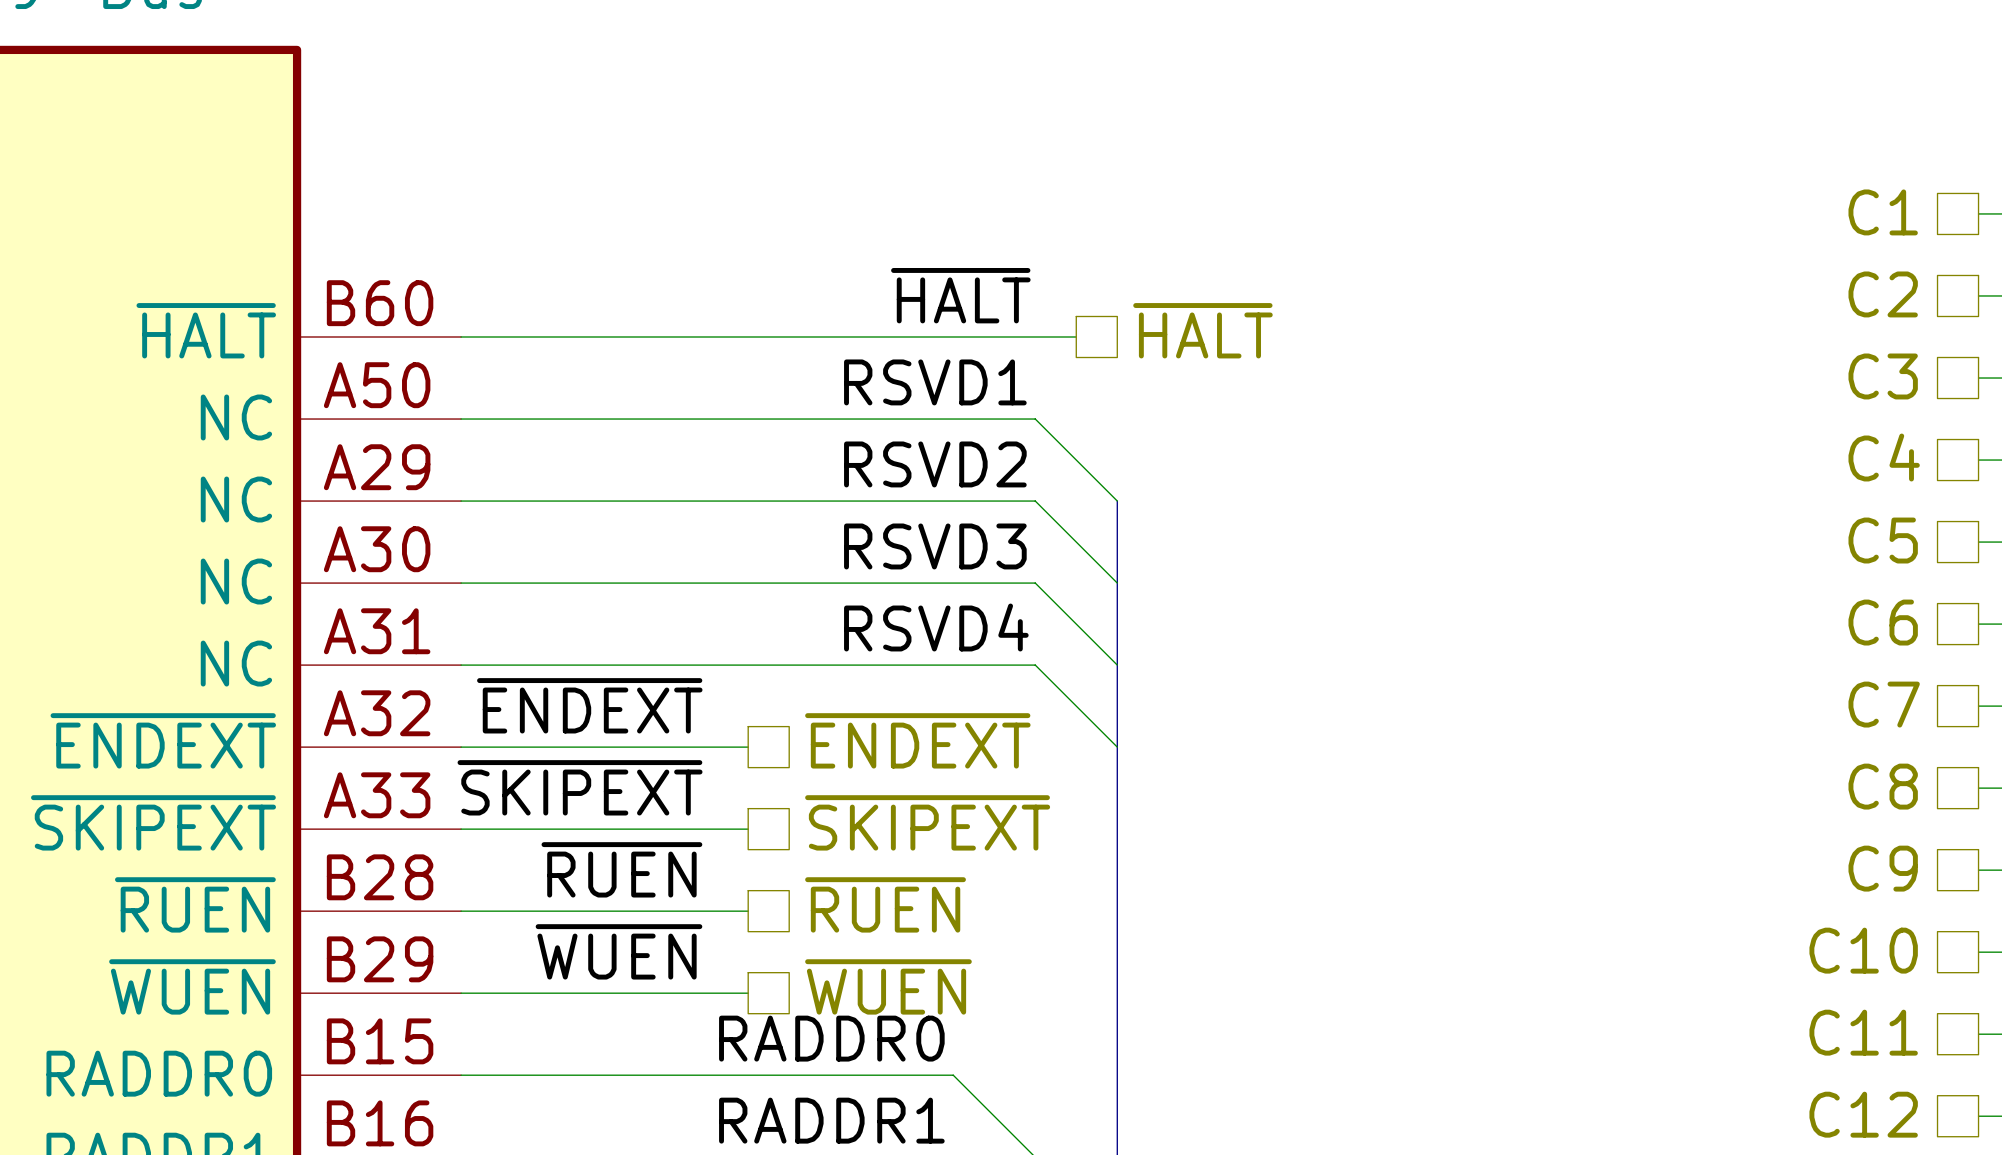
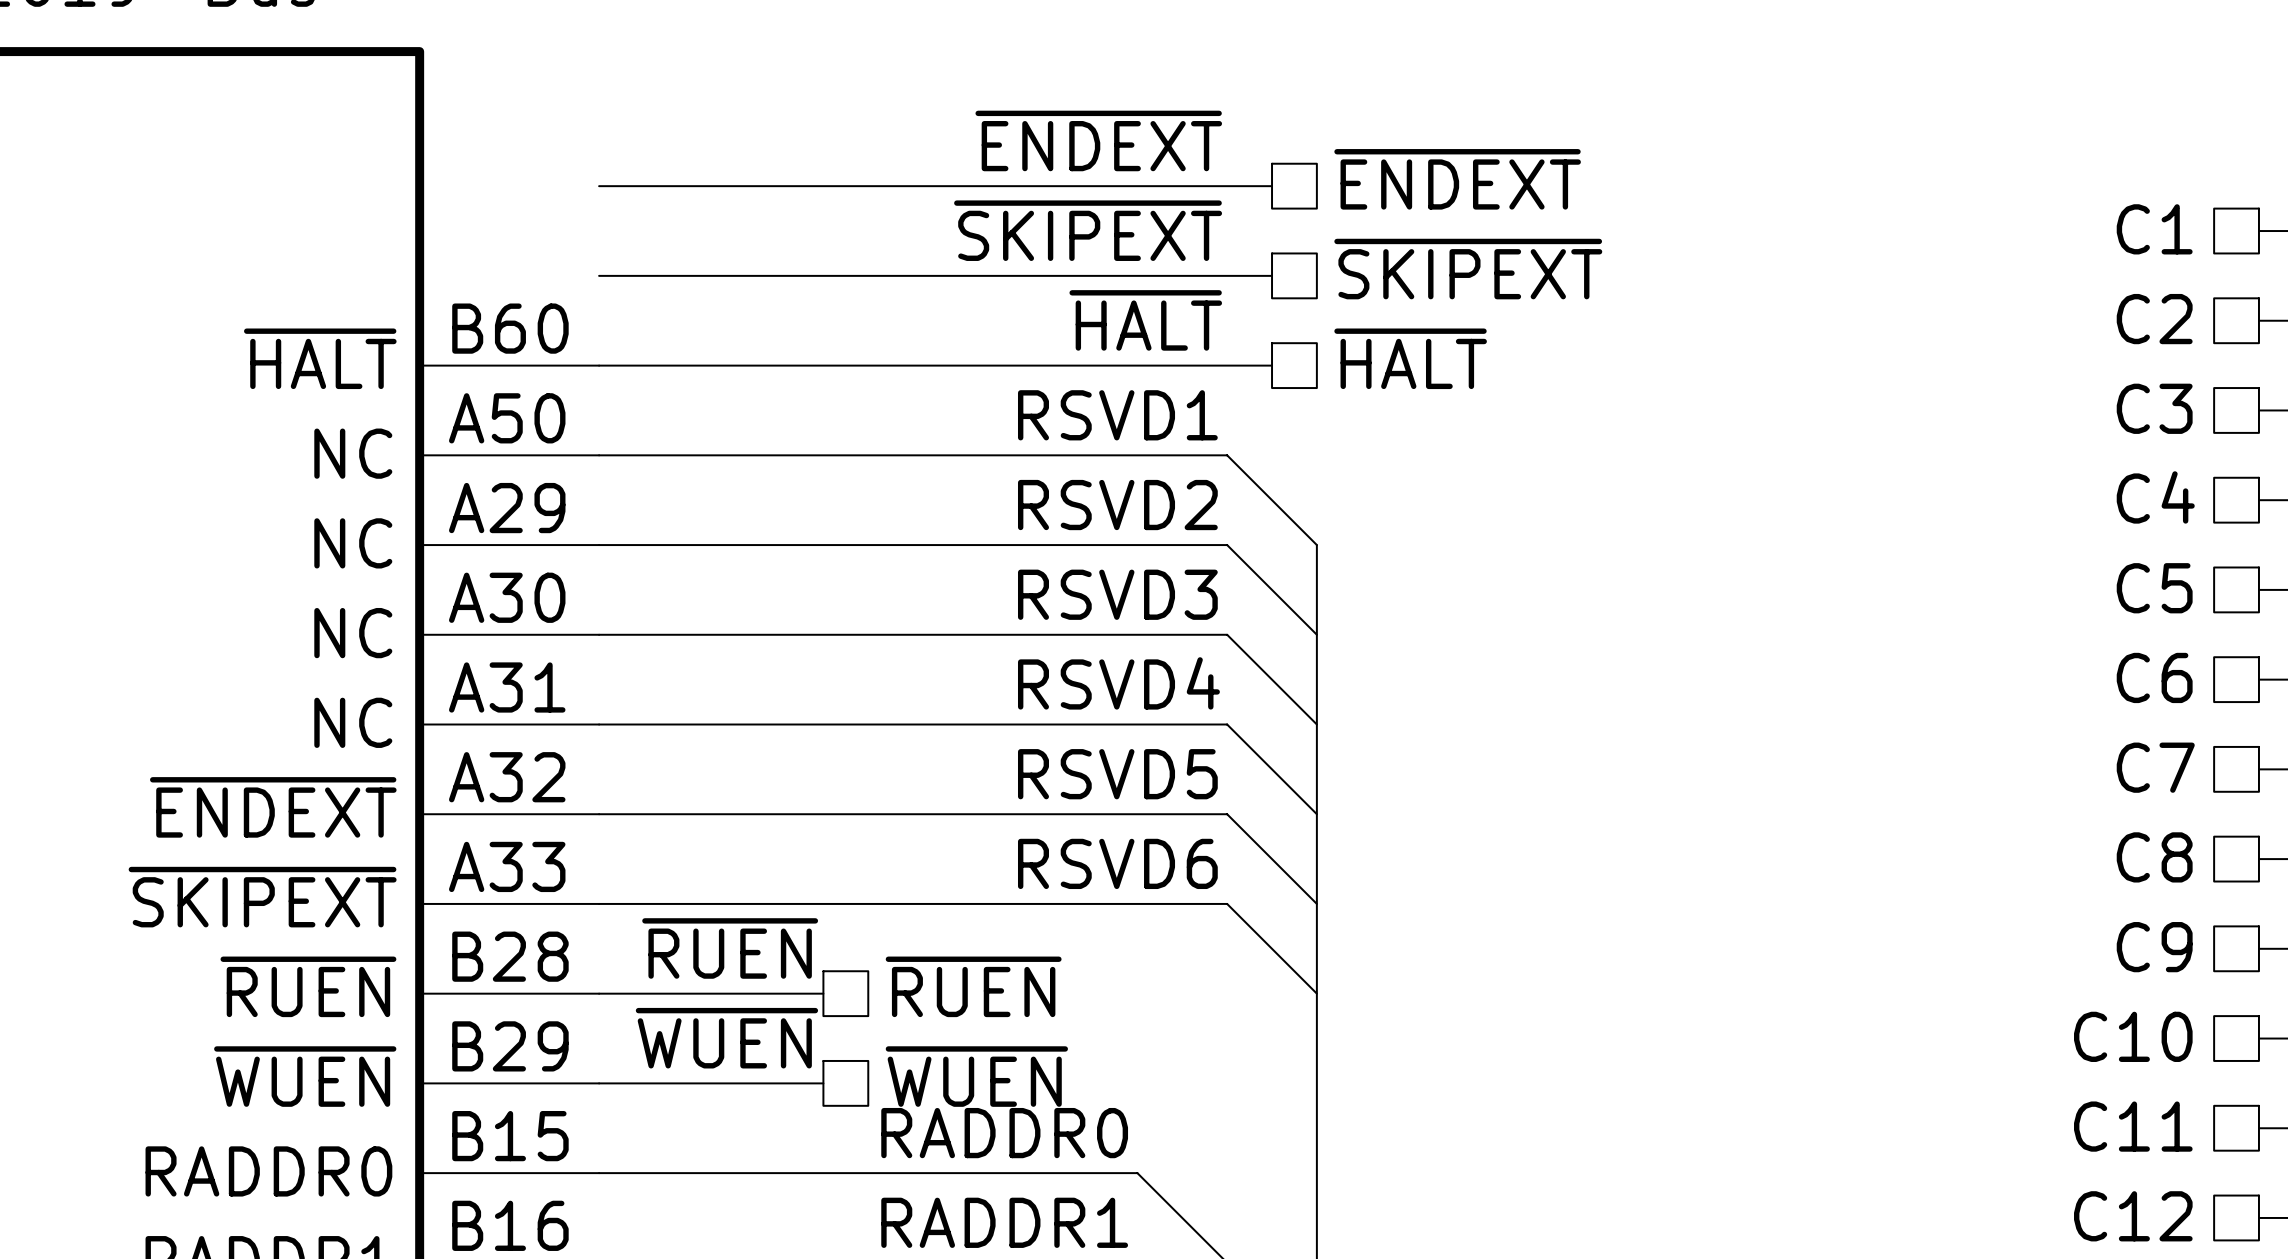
wire: none -> (599, 186) (1272, 186)
wire: none -> (599, 275) (1272, 275)
label position: ~{ENDEXT} (589, 705) -> ~{ENDEXT} (1098, 140)
label: none -> RSVD5 (1117, 774)
hierarchical label position: ~{ENDEXT} (917, 740) -> ~{ENDEXT} (1457, 179)
wire: none -> (913, 814) (1227, 814) (1316, 903)
label position: ~{SKIPEXT} (580, 787) -> ~{SKIPEXT} (1088, 230)
label: none -> RSVD6 (1117, 863)
hierarchical label position: ~{SKIPEXT} (927, 822) -> ~{SKIPEXT} (1468, 269)
wire: none -> (913, 903) (1227, 903) (1316, 993)
label position: ~{RUEN} (621, 869) -> ~{RUEN} (730, 948)
hierarchical label position: ~{RUEN} (885, 904) -> ~{RUEN} (973, 986)
wire: (666, 911) (748, 911) -> none
label position: ~{WUEN} (618, 951) -> ~{WUEN} (726, 1038)
hierarchical label position: ~{WUEN} (888, 986) -> ~{WUEN} (976, 1076)
wire: (666, 993) (748, 993) -> none

